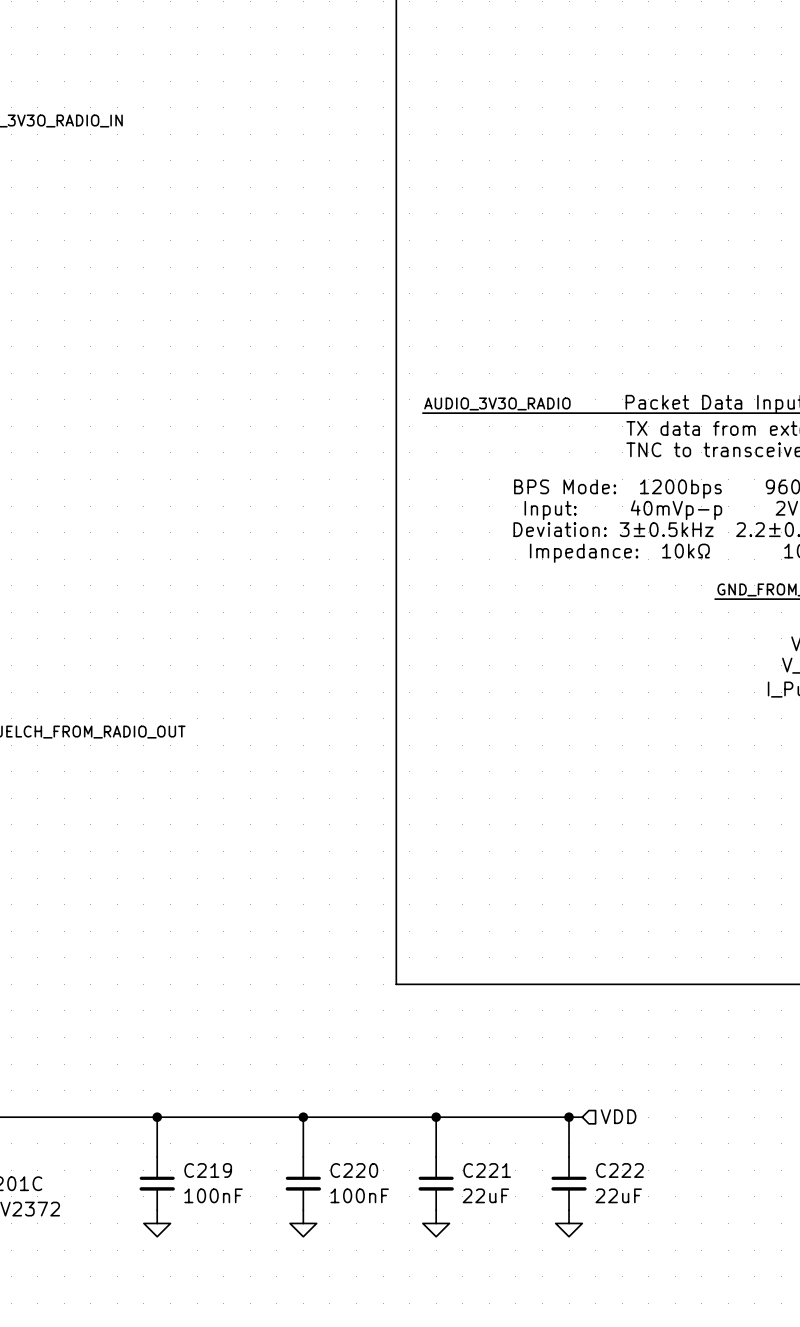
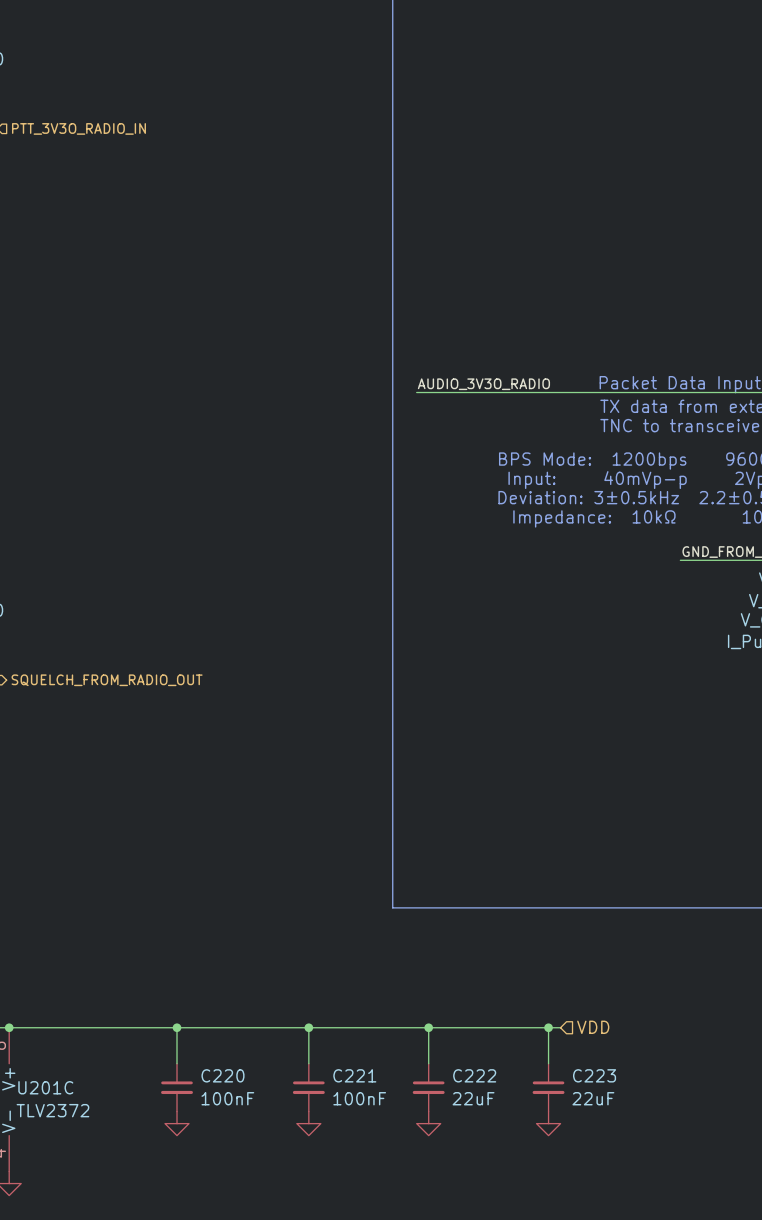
C219 name: C219 (208, 1170) -> C220 (222, 1075)
C220 name: C220 (354, 1170) -> C221 (354, 1075)
C221 name: C221 (487, 1170) -> C222 (474, 1075)
C222 name: C222 (619, 1170) -> C223 (594, 1075)

